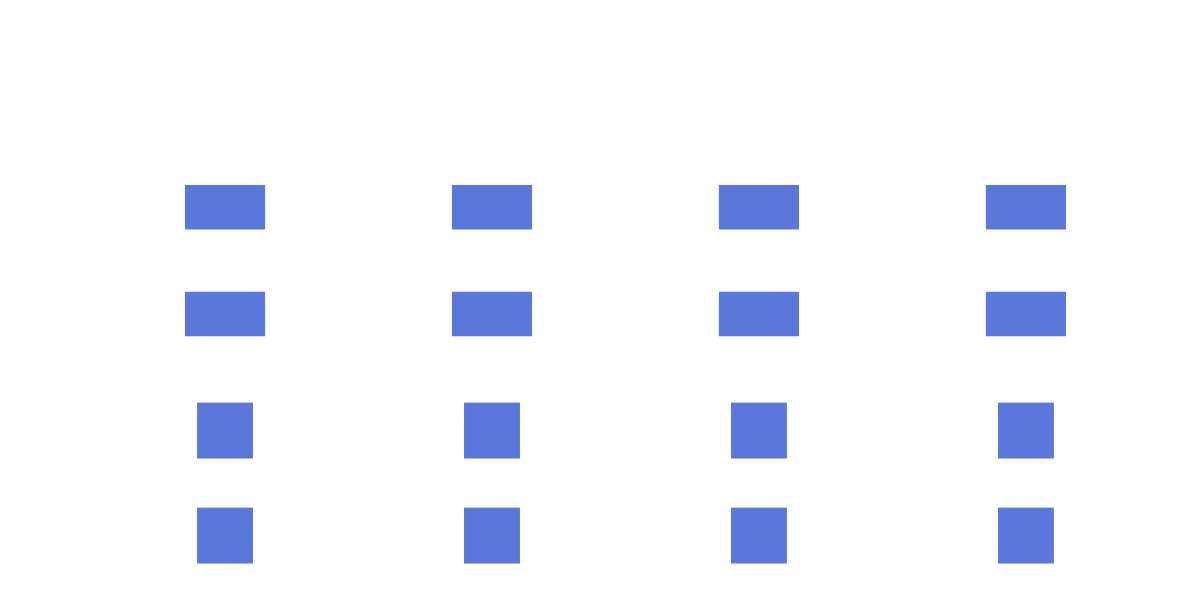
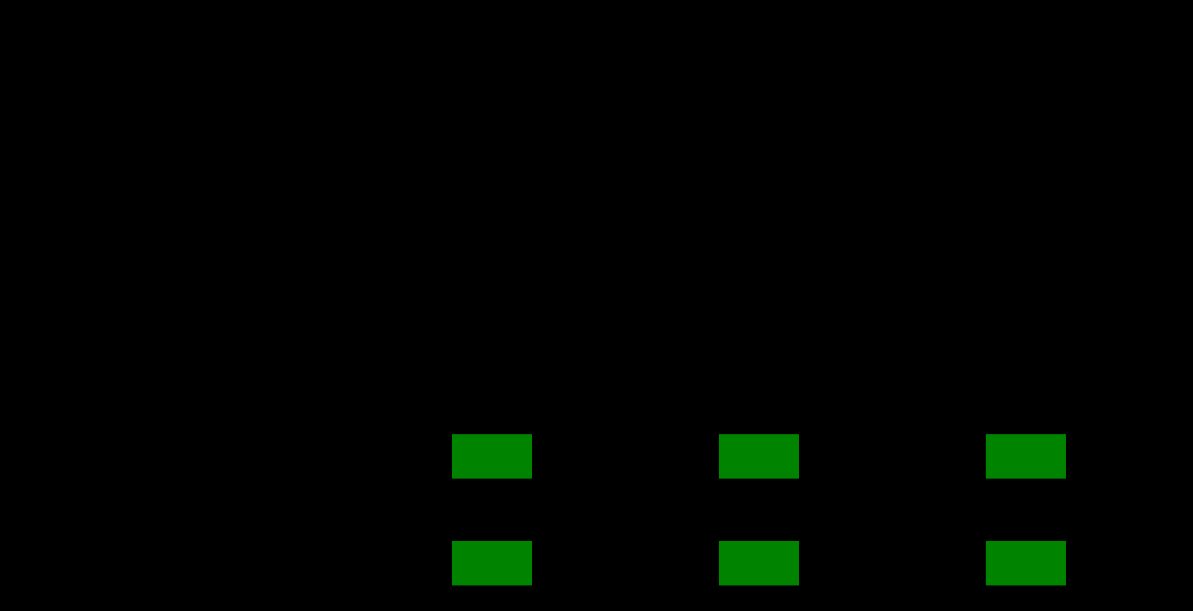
part: (225, 260) -> none
part: (491, 260) -> none
part: (758, 260) -> none
part: (1025, 260) -> none
part footprint: [464, 402, 520, 564] -> [451, 434, 533, 586]
part footprint: [731, 402, 787, 564] -> [718, 434, 799, 586]
part footprint: [997, 402, 1054, 564] -> [985, 434, 1066, 586]
part: (225, 483) -> none

